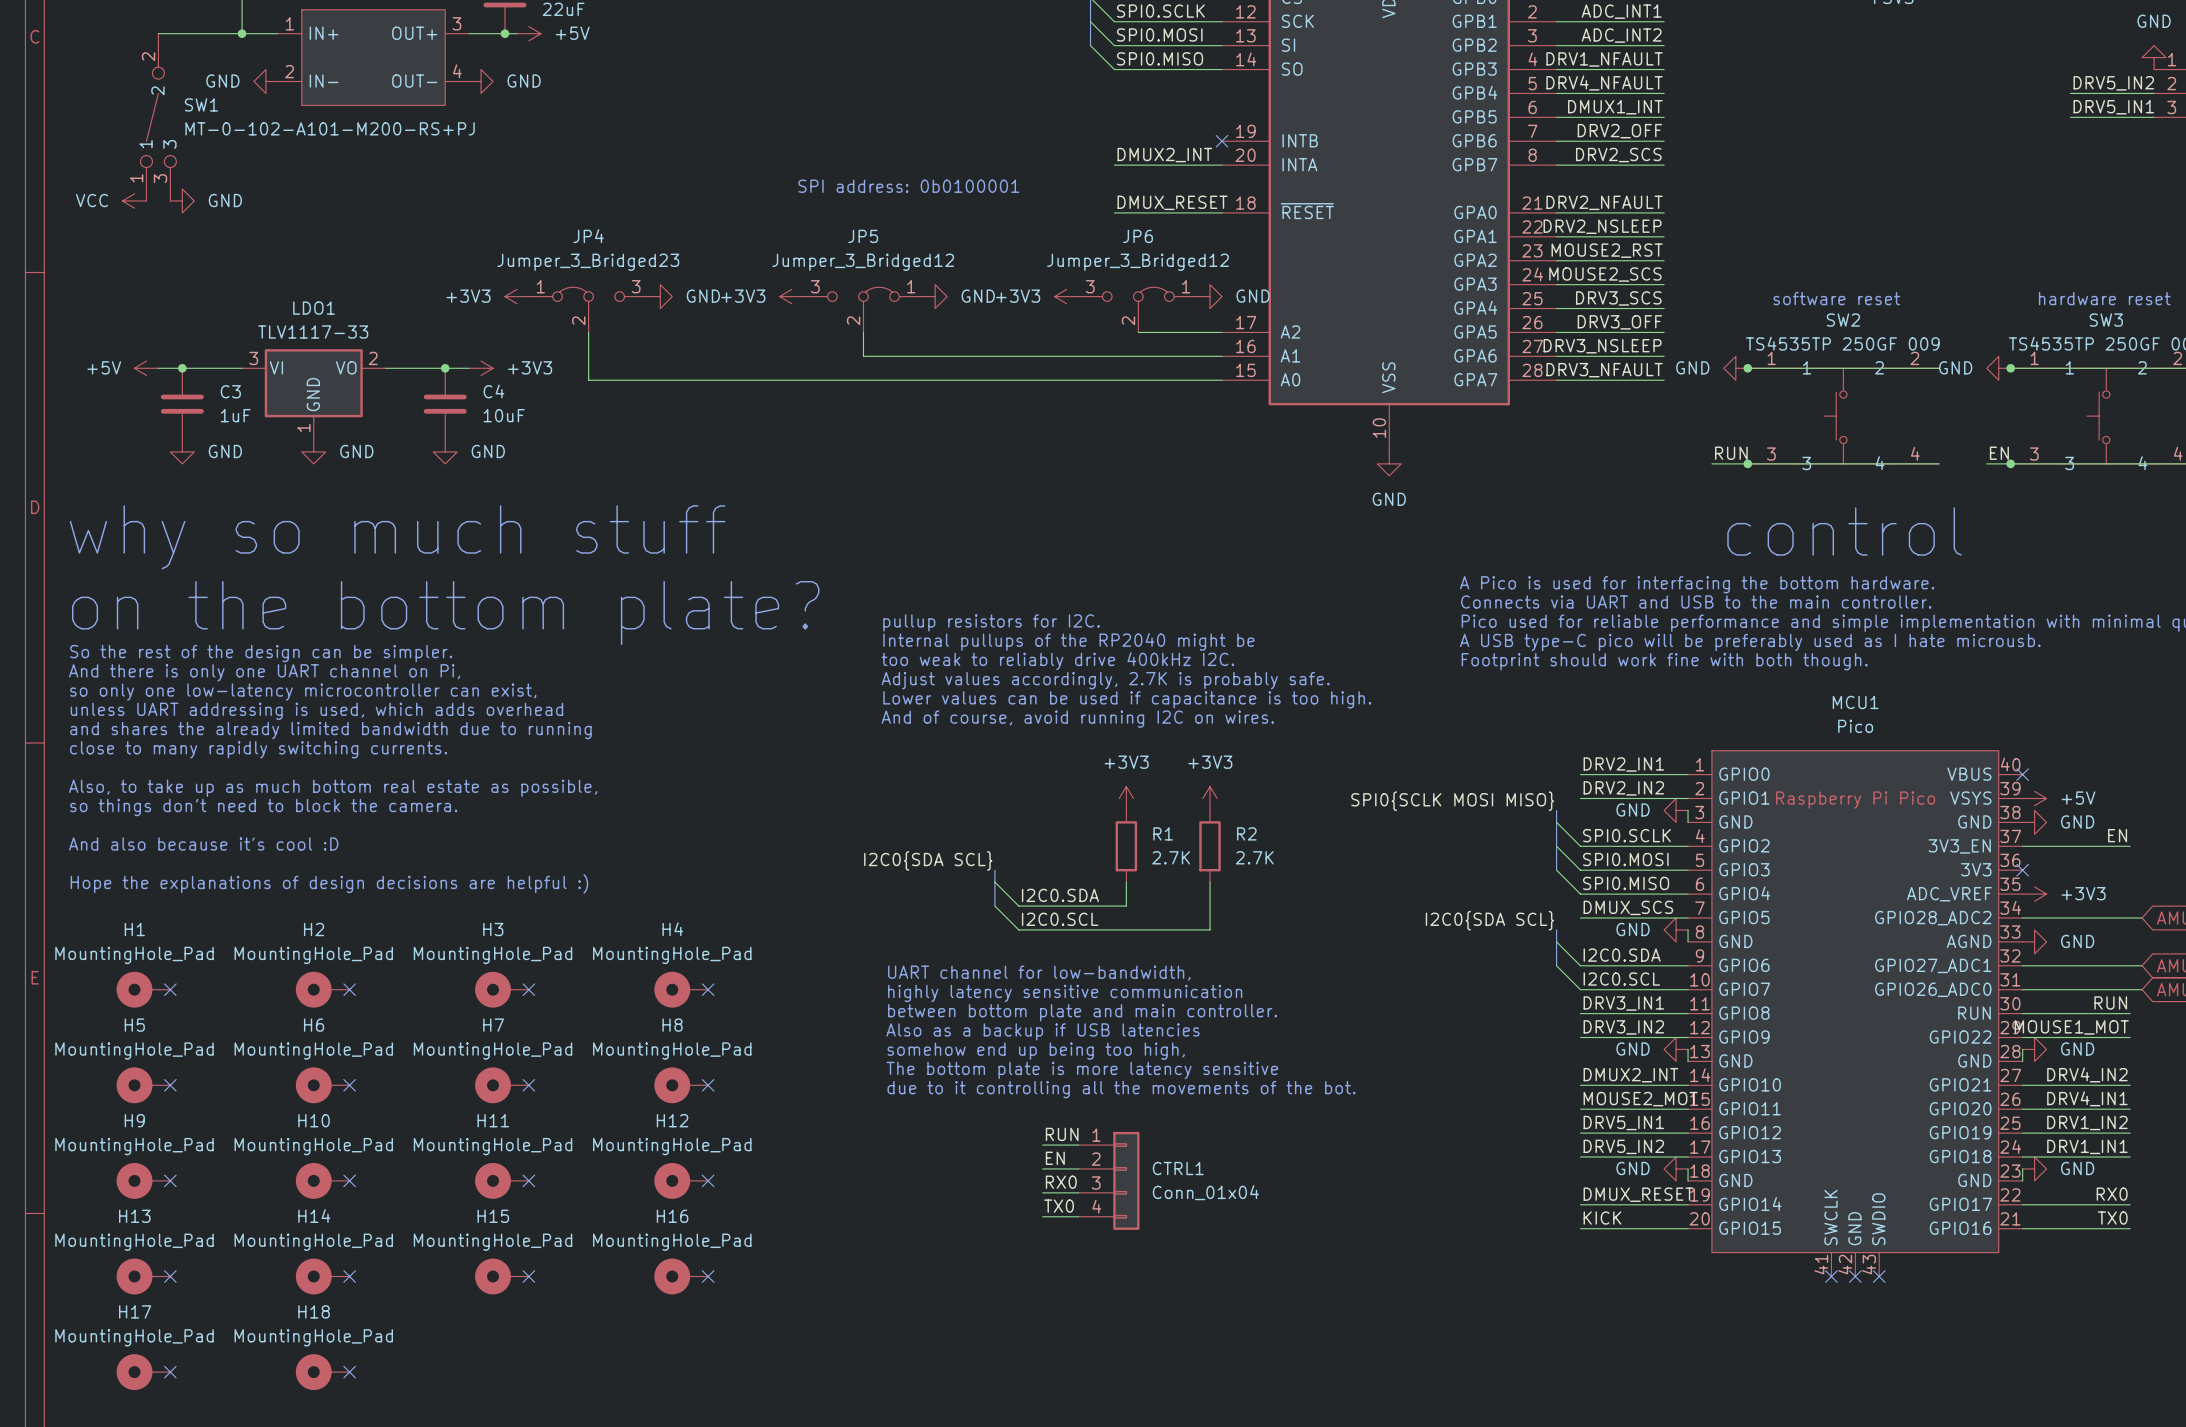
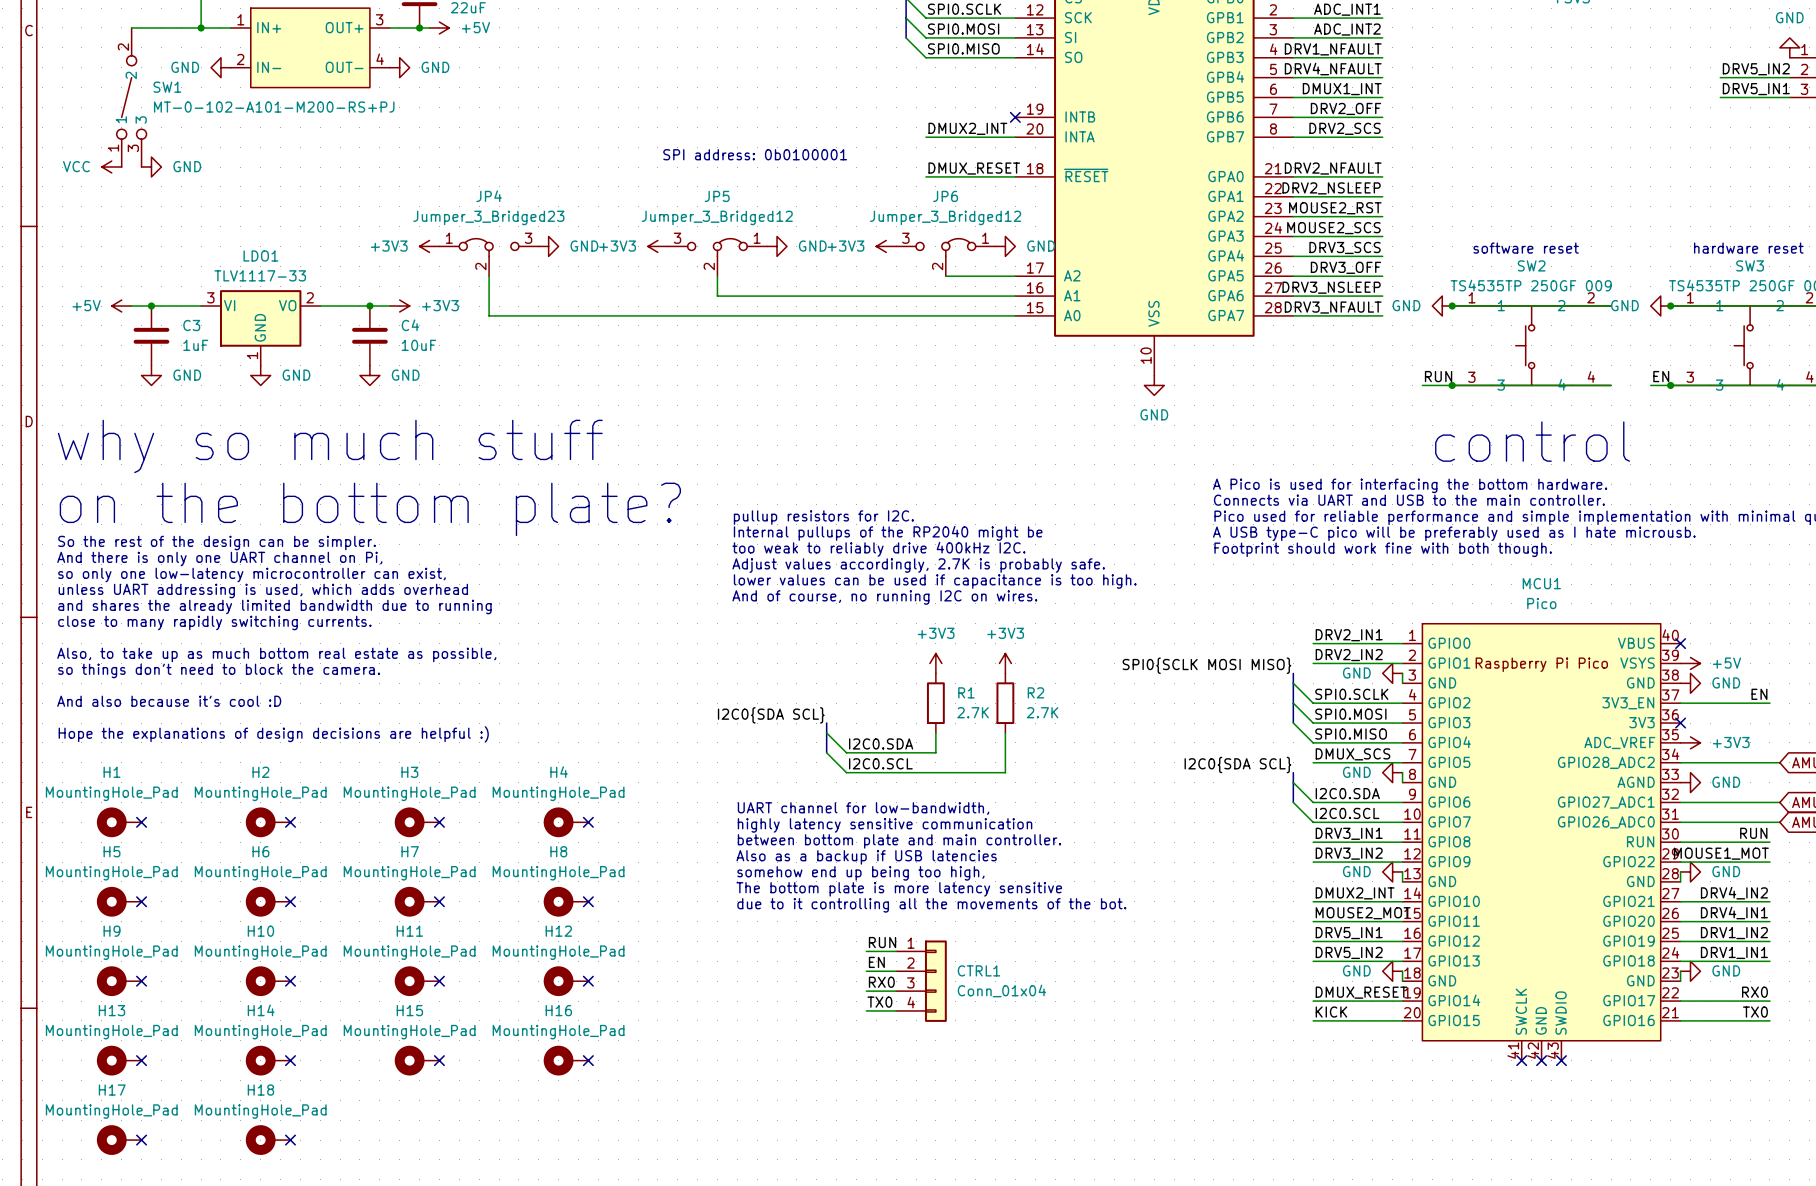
text: Lower values can be used if capacitance is too high. (1127, 699) -> lower values can be used if capacitance is too high. (935, 581)
text: And of course, avoid running I2C on wires. (1077, 719) -> And of course, no running I2C on wires. (884, 597)

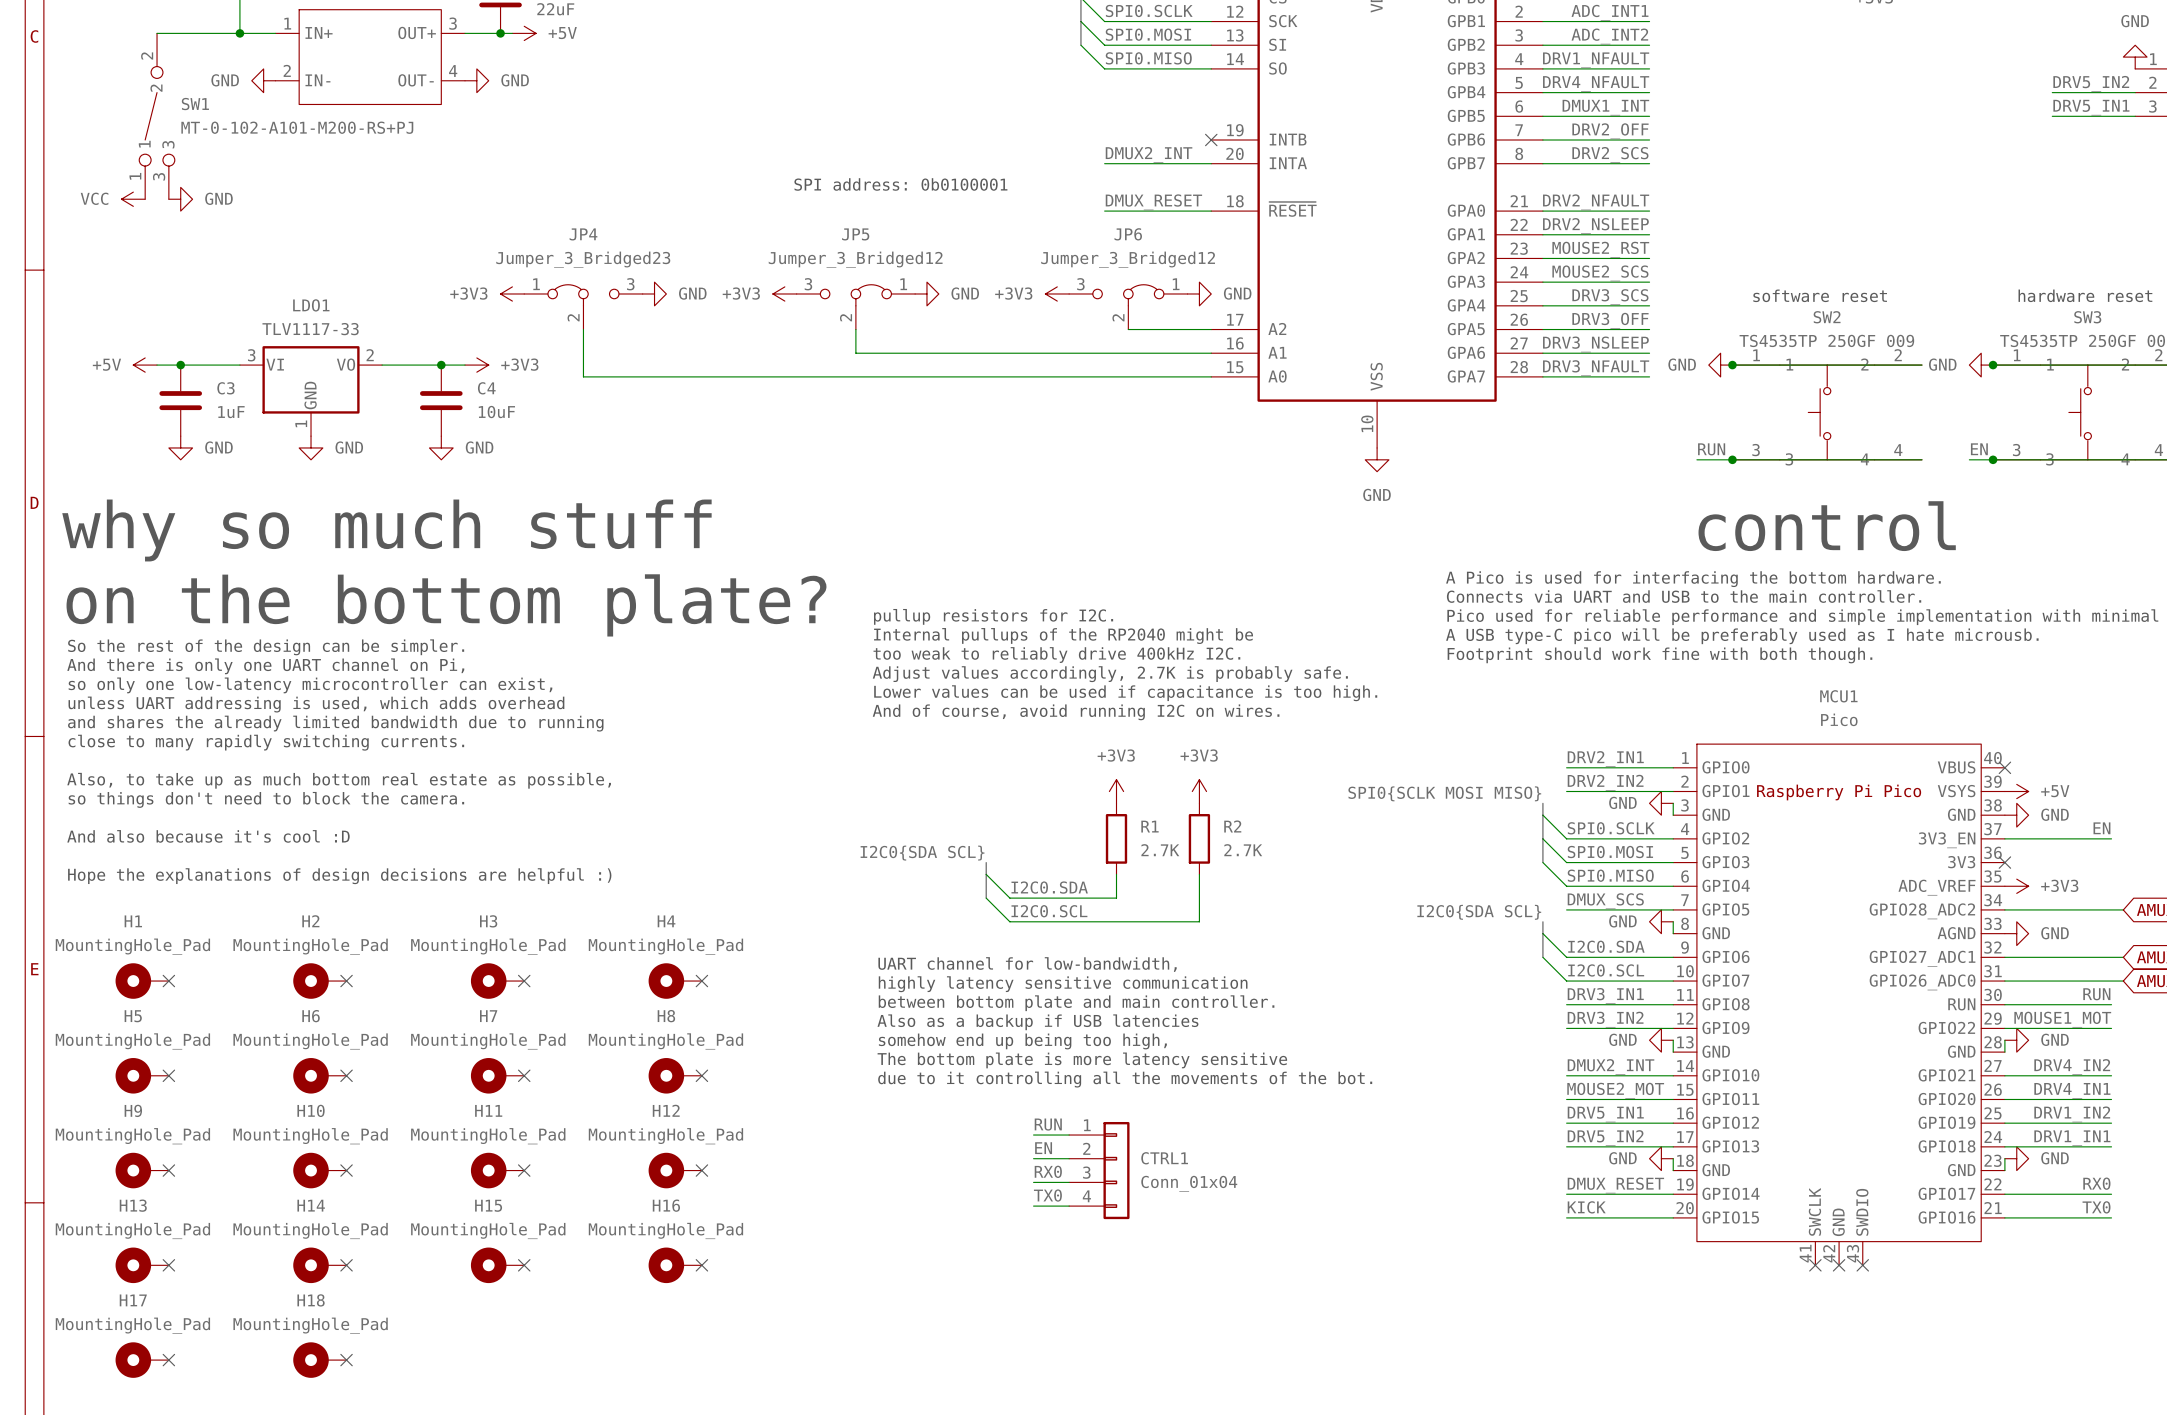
text: lower values can be used if capacitance is too high. (935, 581) -> Lower values can be used if capacitance is too high. (1125, 693)
text: And of course, no running I2C on wires. (884, 597) -> And of course, avoid running I2C on wires. (1076, 712)

